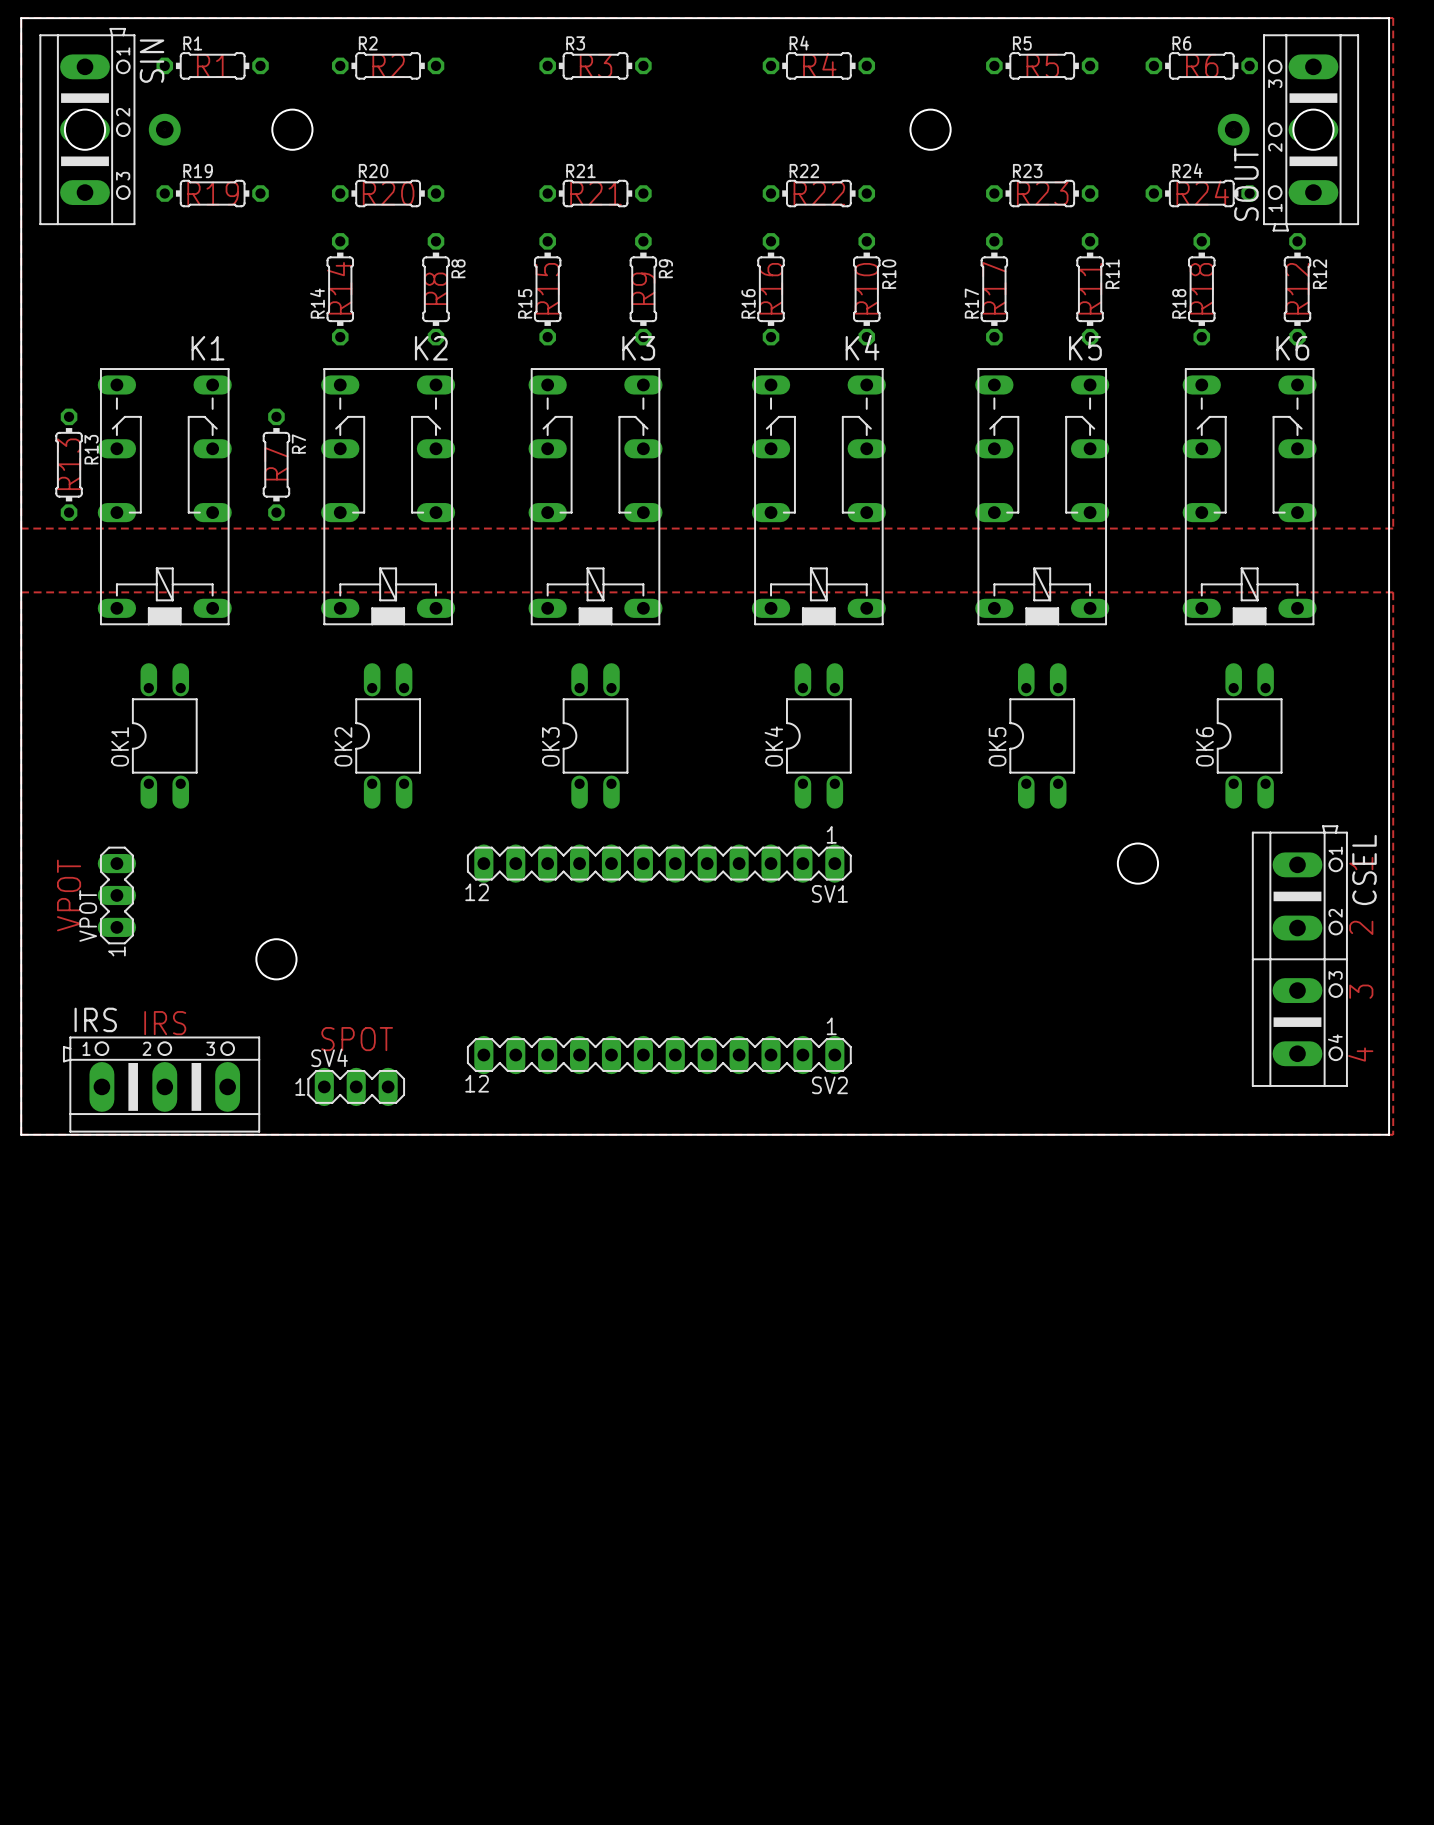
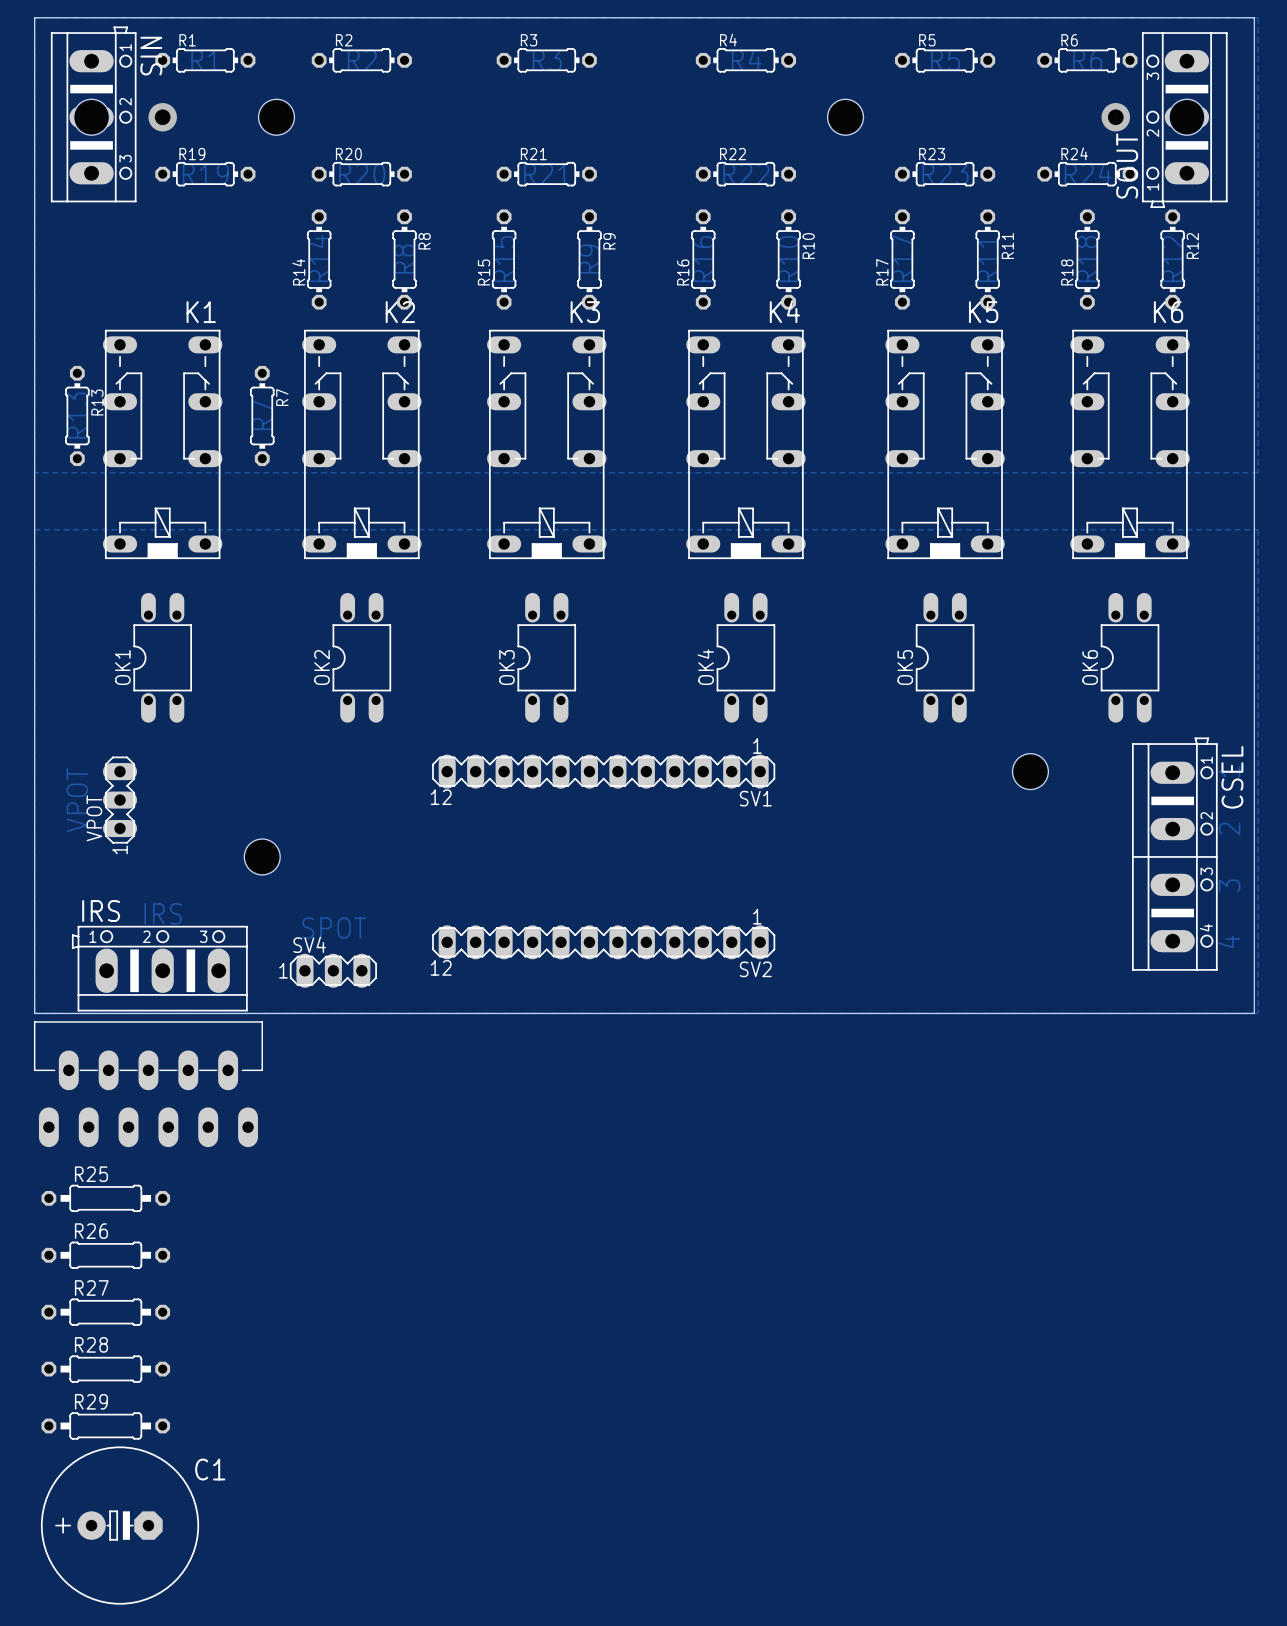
part: none -> (148, 1084)
R25: none -> (105, 1198)
R26: none -> (105, 1255)
R27: none -> (105, 1312)
R28: none -> (105, 1369)
R29: none -> (105, 1425)
C1: none -> (120, 1525)

